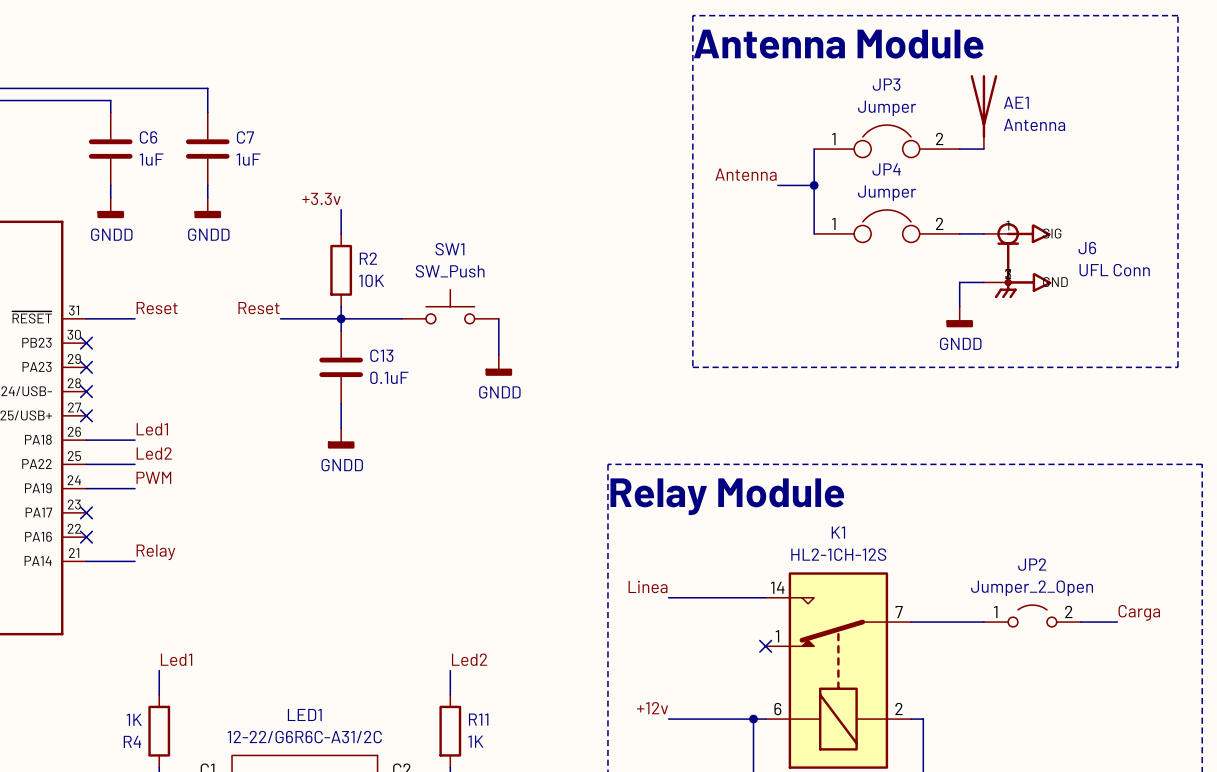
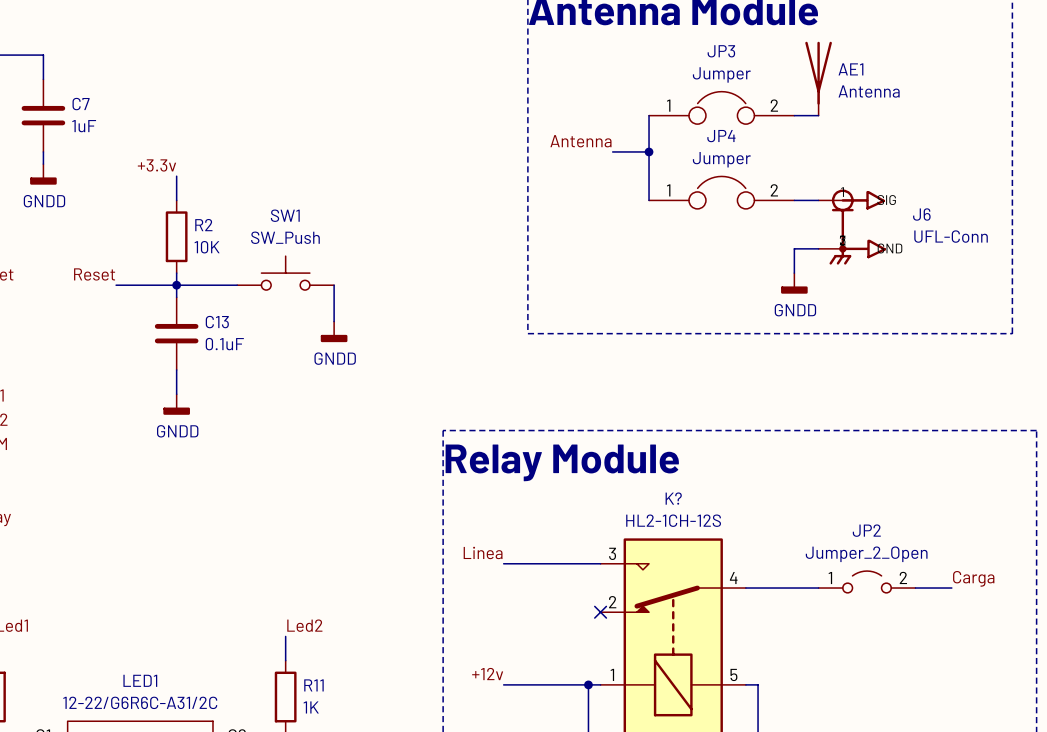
J6 value: UFL Conn (1114, 270) -> UFL-Conn (951, 236)
K1 name: K1 (838, 532) -> K? (673, 498)
K1 pin number: 14 (777, 587) -> 3 (612, 553)
K1 pin number: 7 (899, 612) -> 4 (733, 578)
K1 pin number: 1 (777, 636) -> 2 (612, 602)
K1 pin number: 2 (899, 708) -> 5 (733, 674)
K1 pin number: 6 (777, 709) -> 1 (612, 674)

